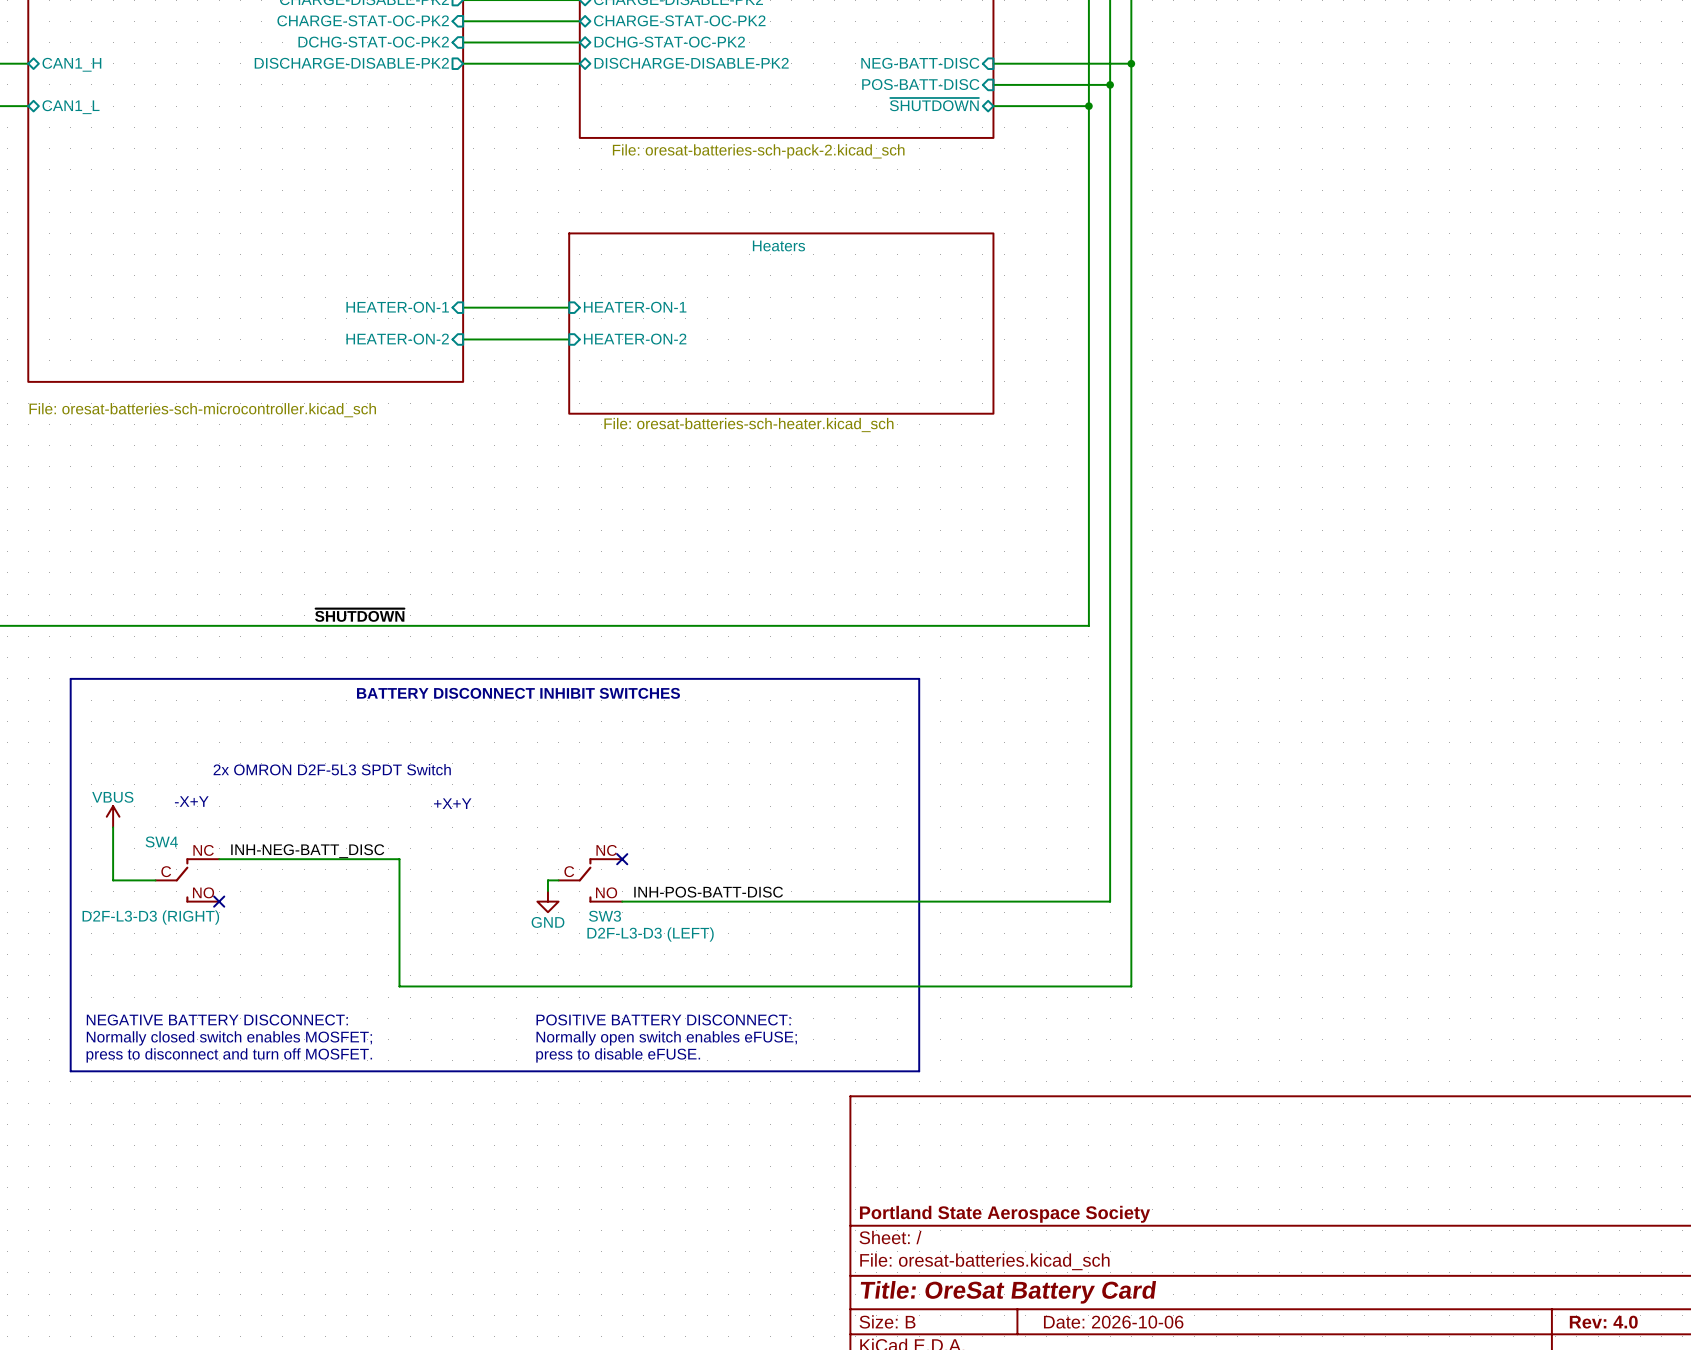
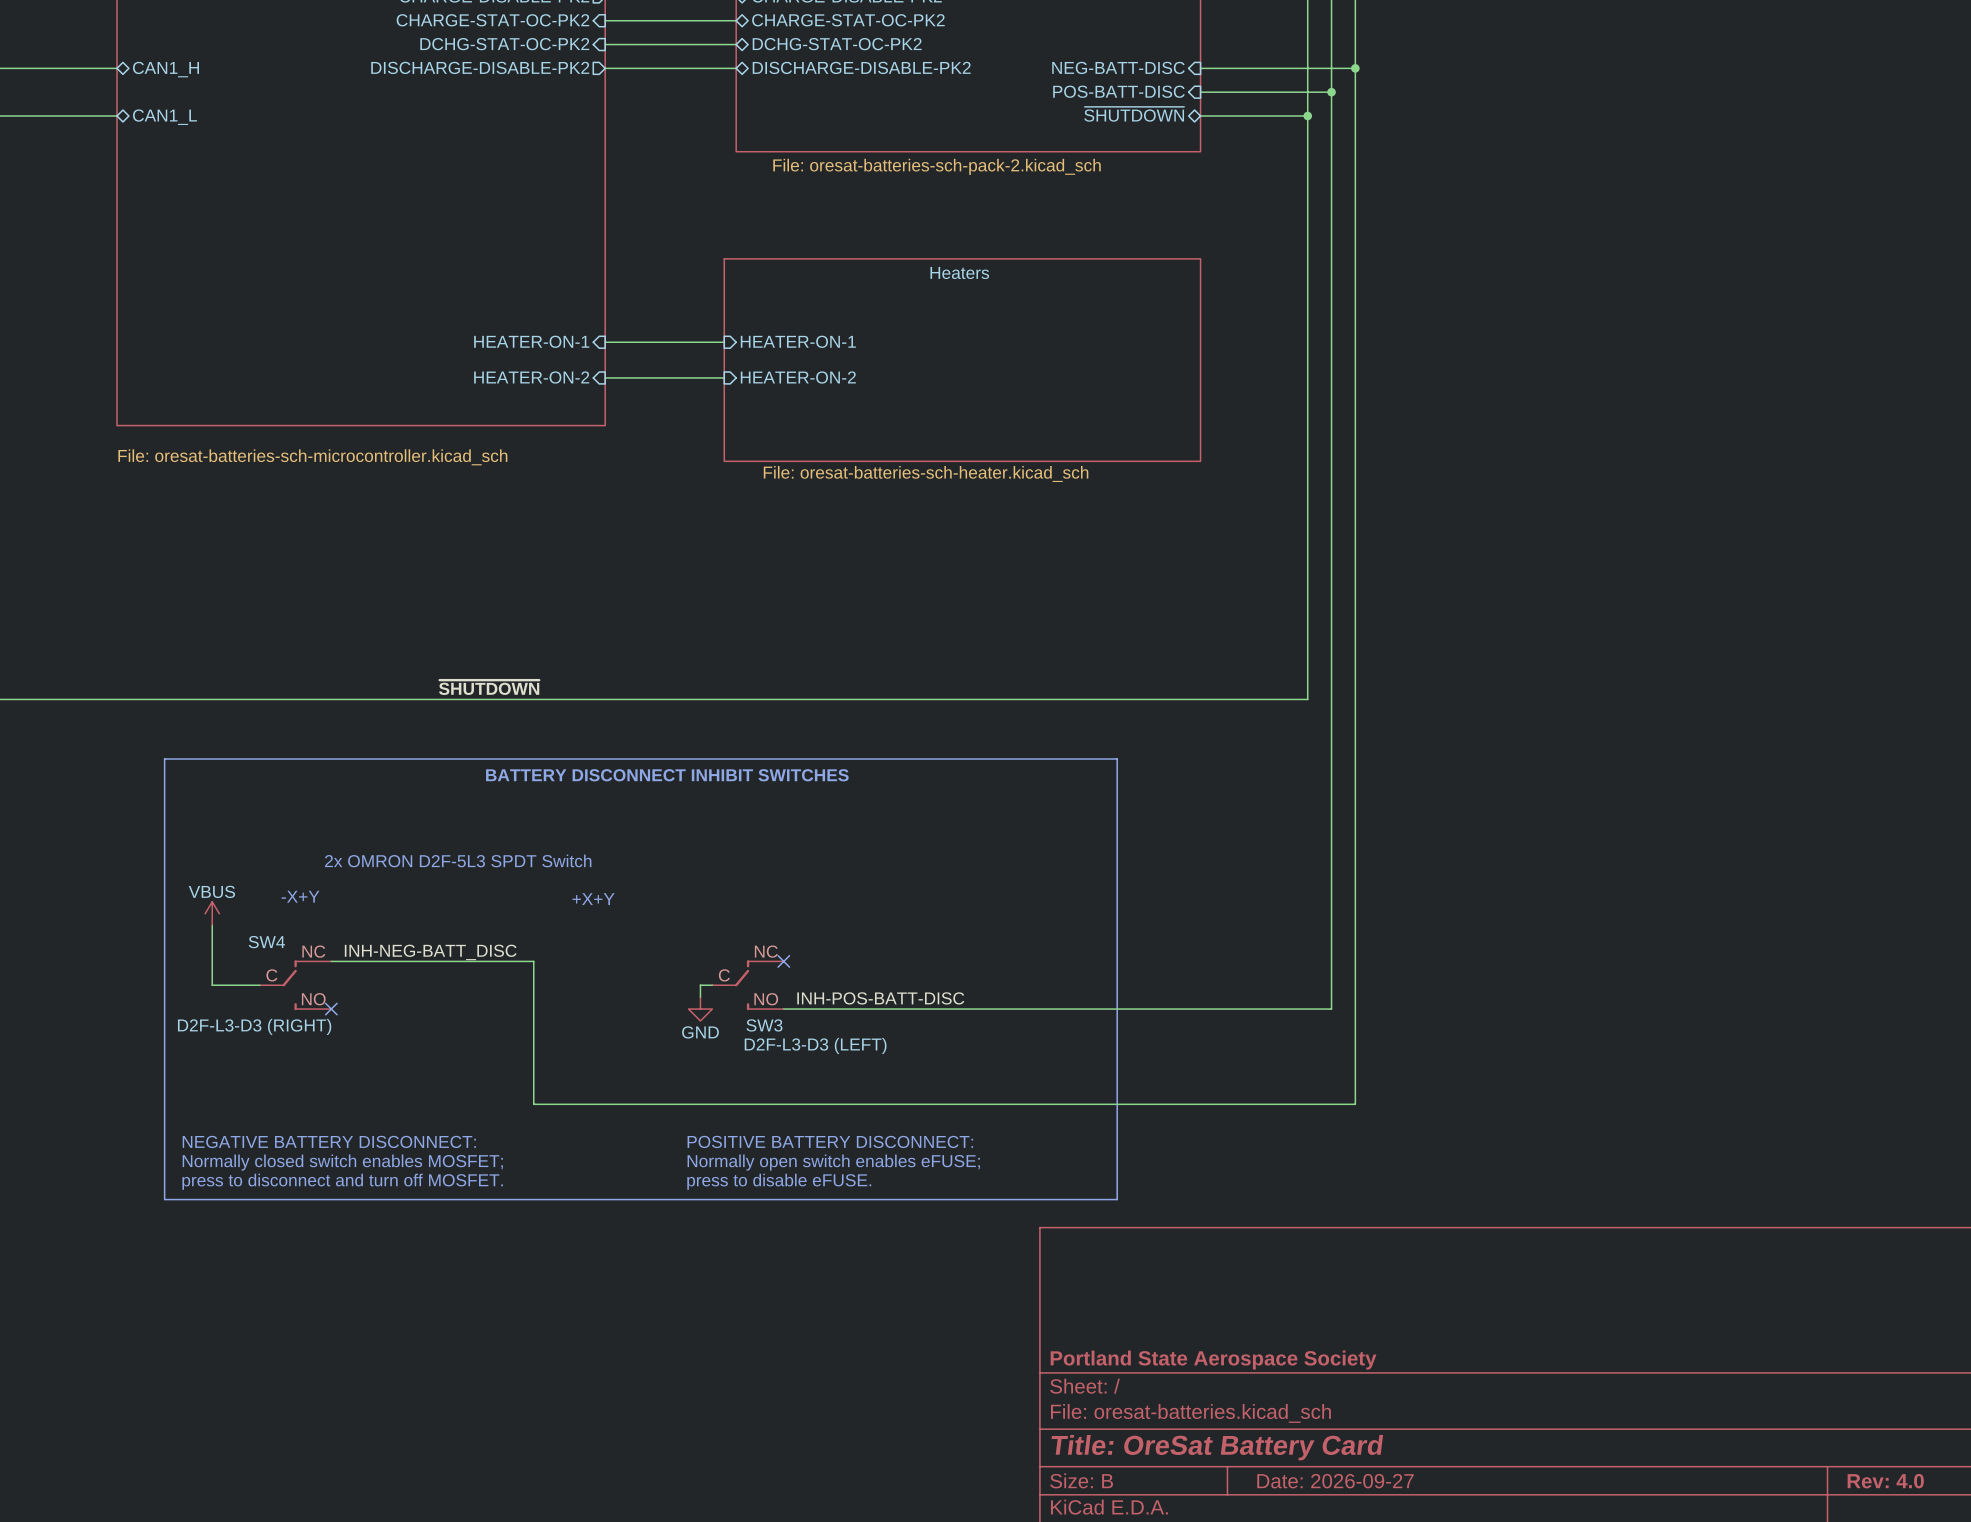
title block: Date: 2026-10-06 (1113, 1322) -> Date: 2026-09-27 (1335, 1481)

